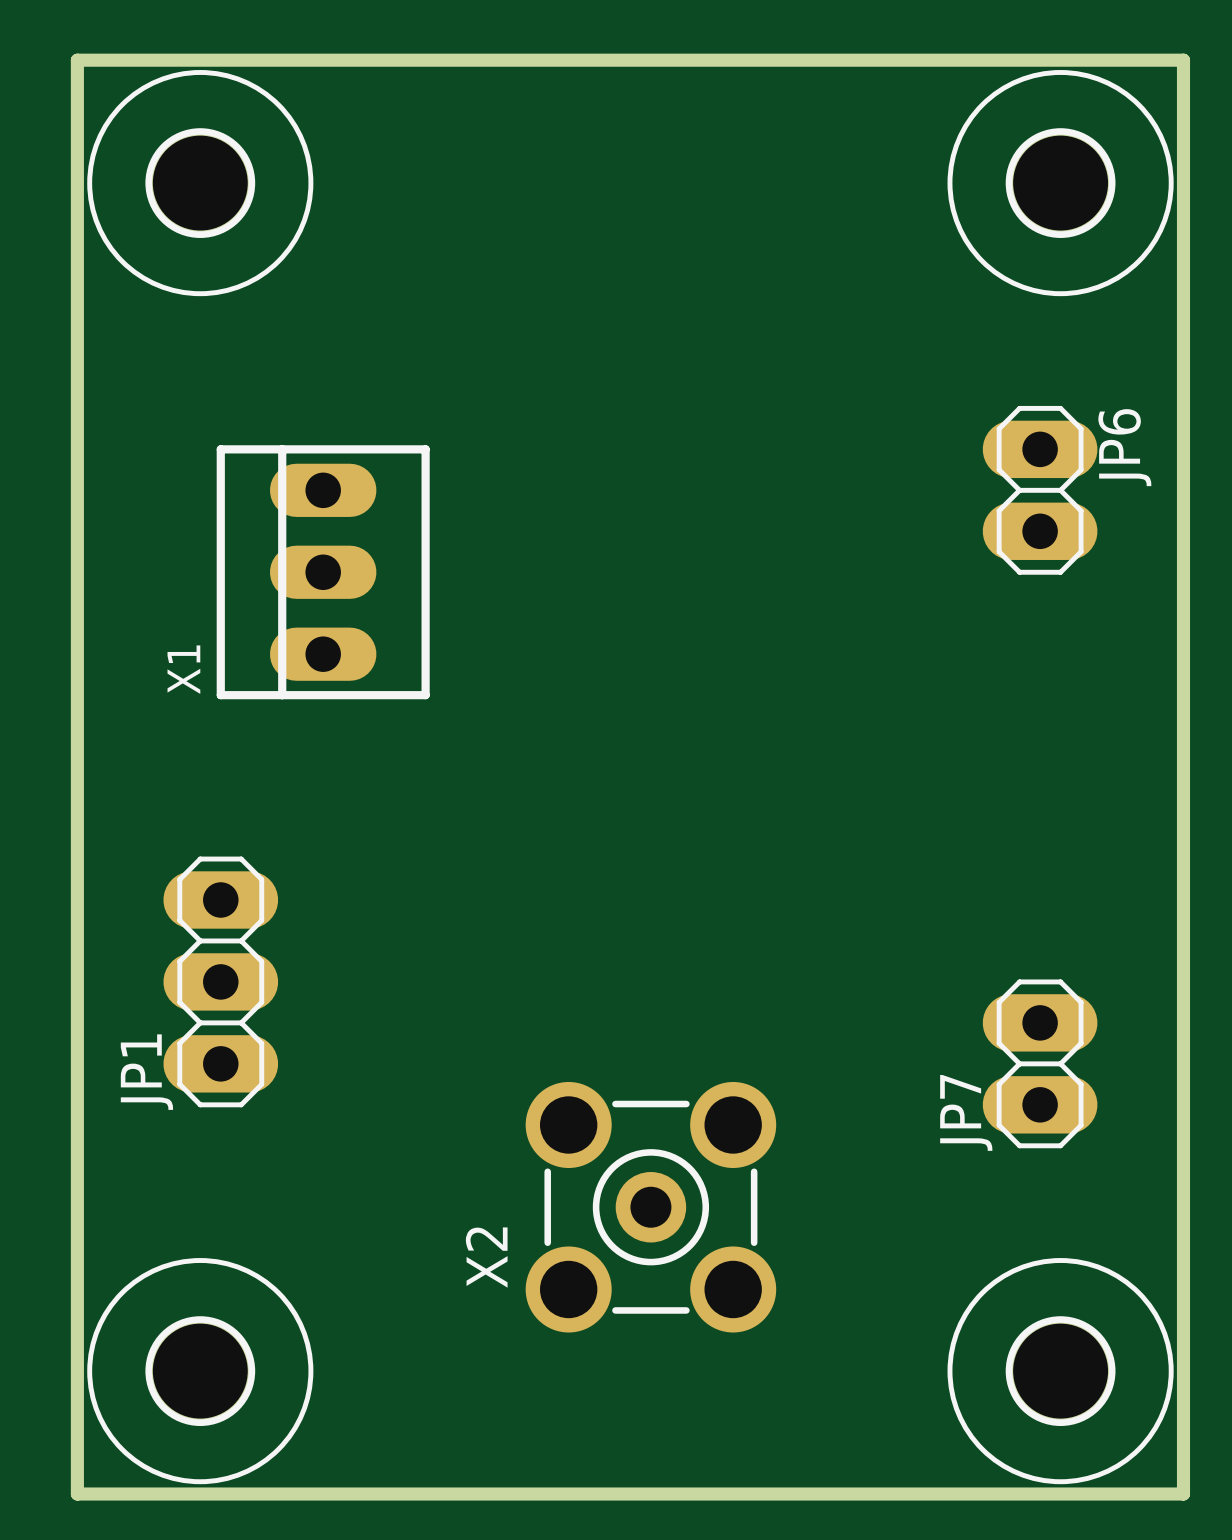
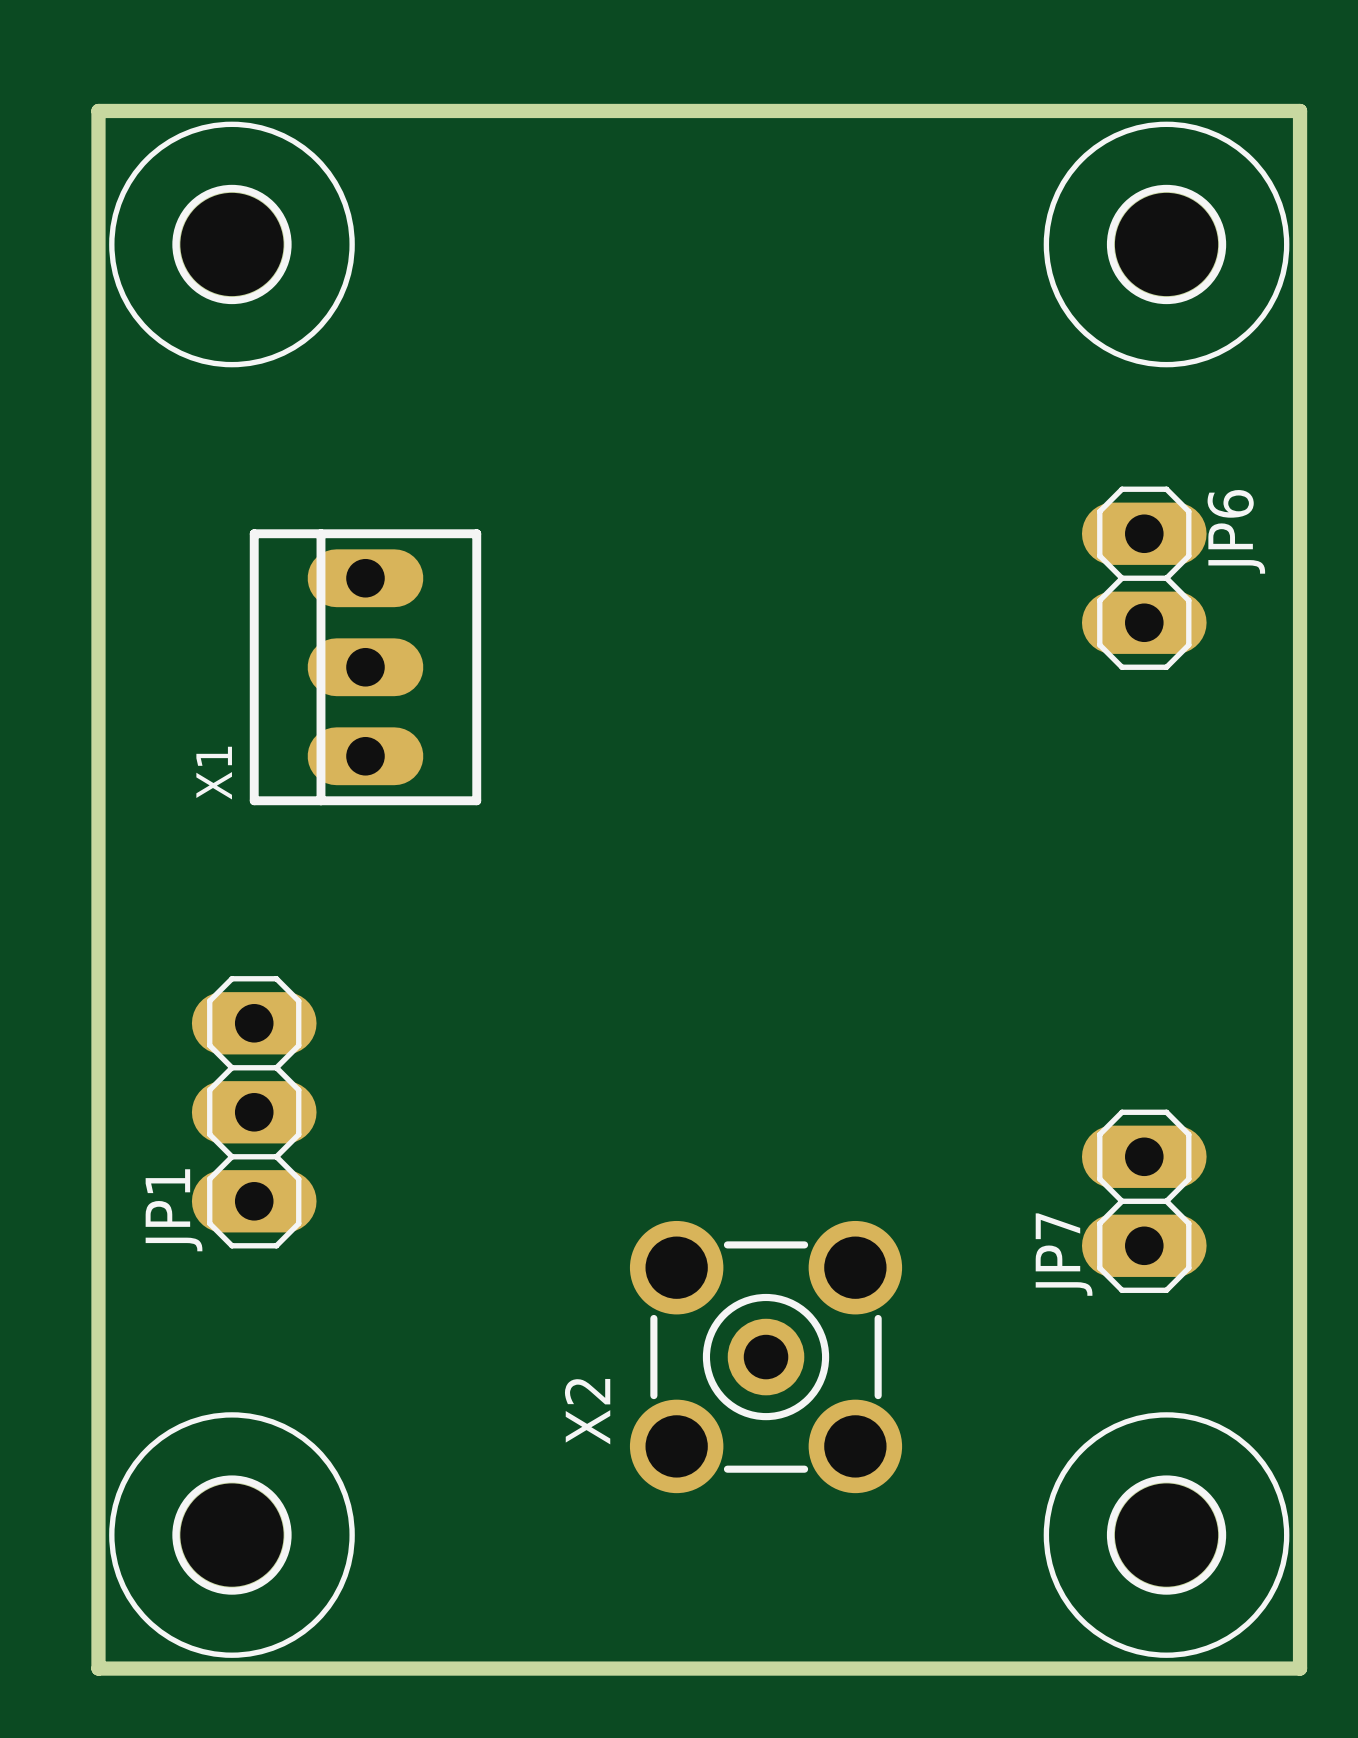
X2 position: (650, 1207) -> (766, 1357)

